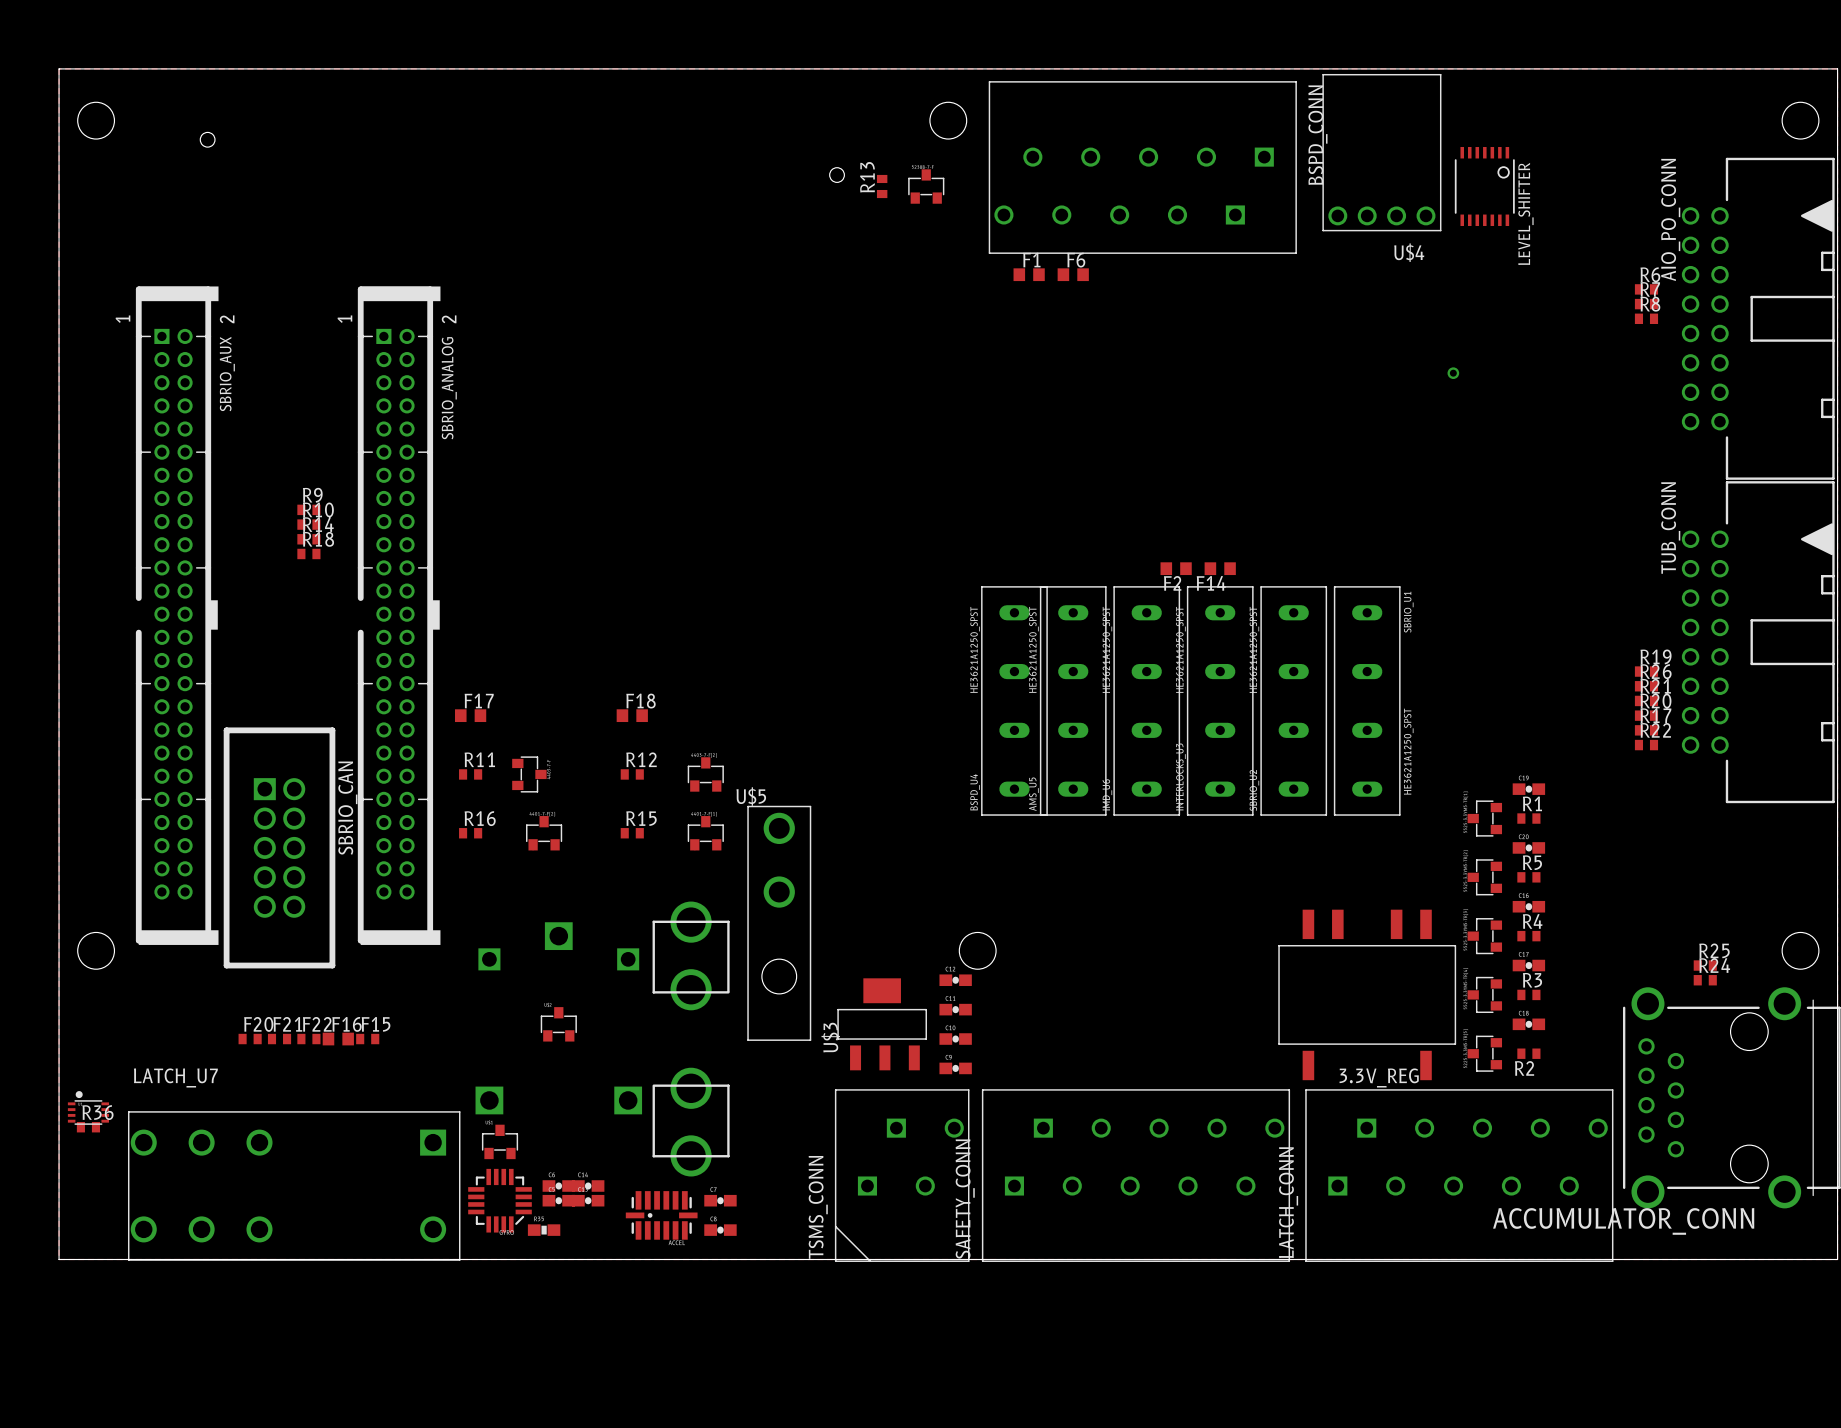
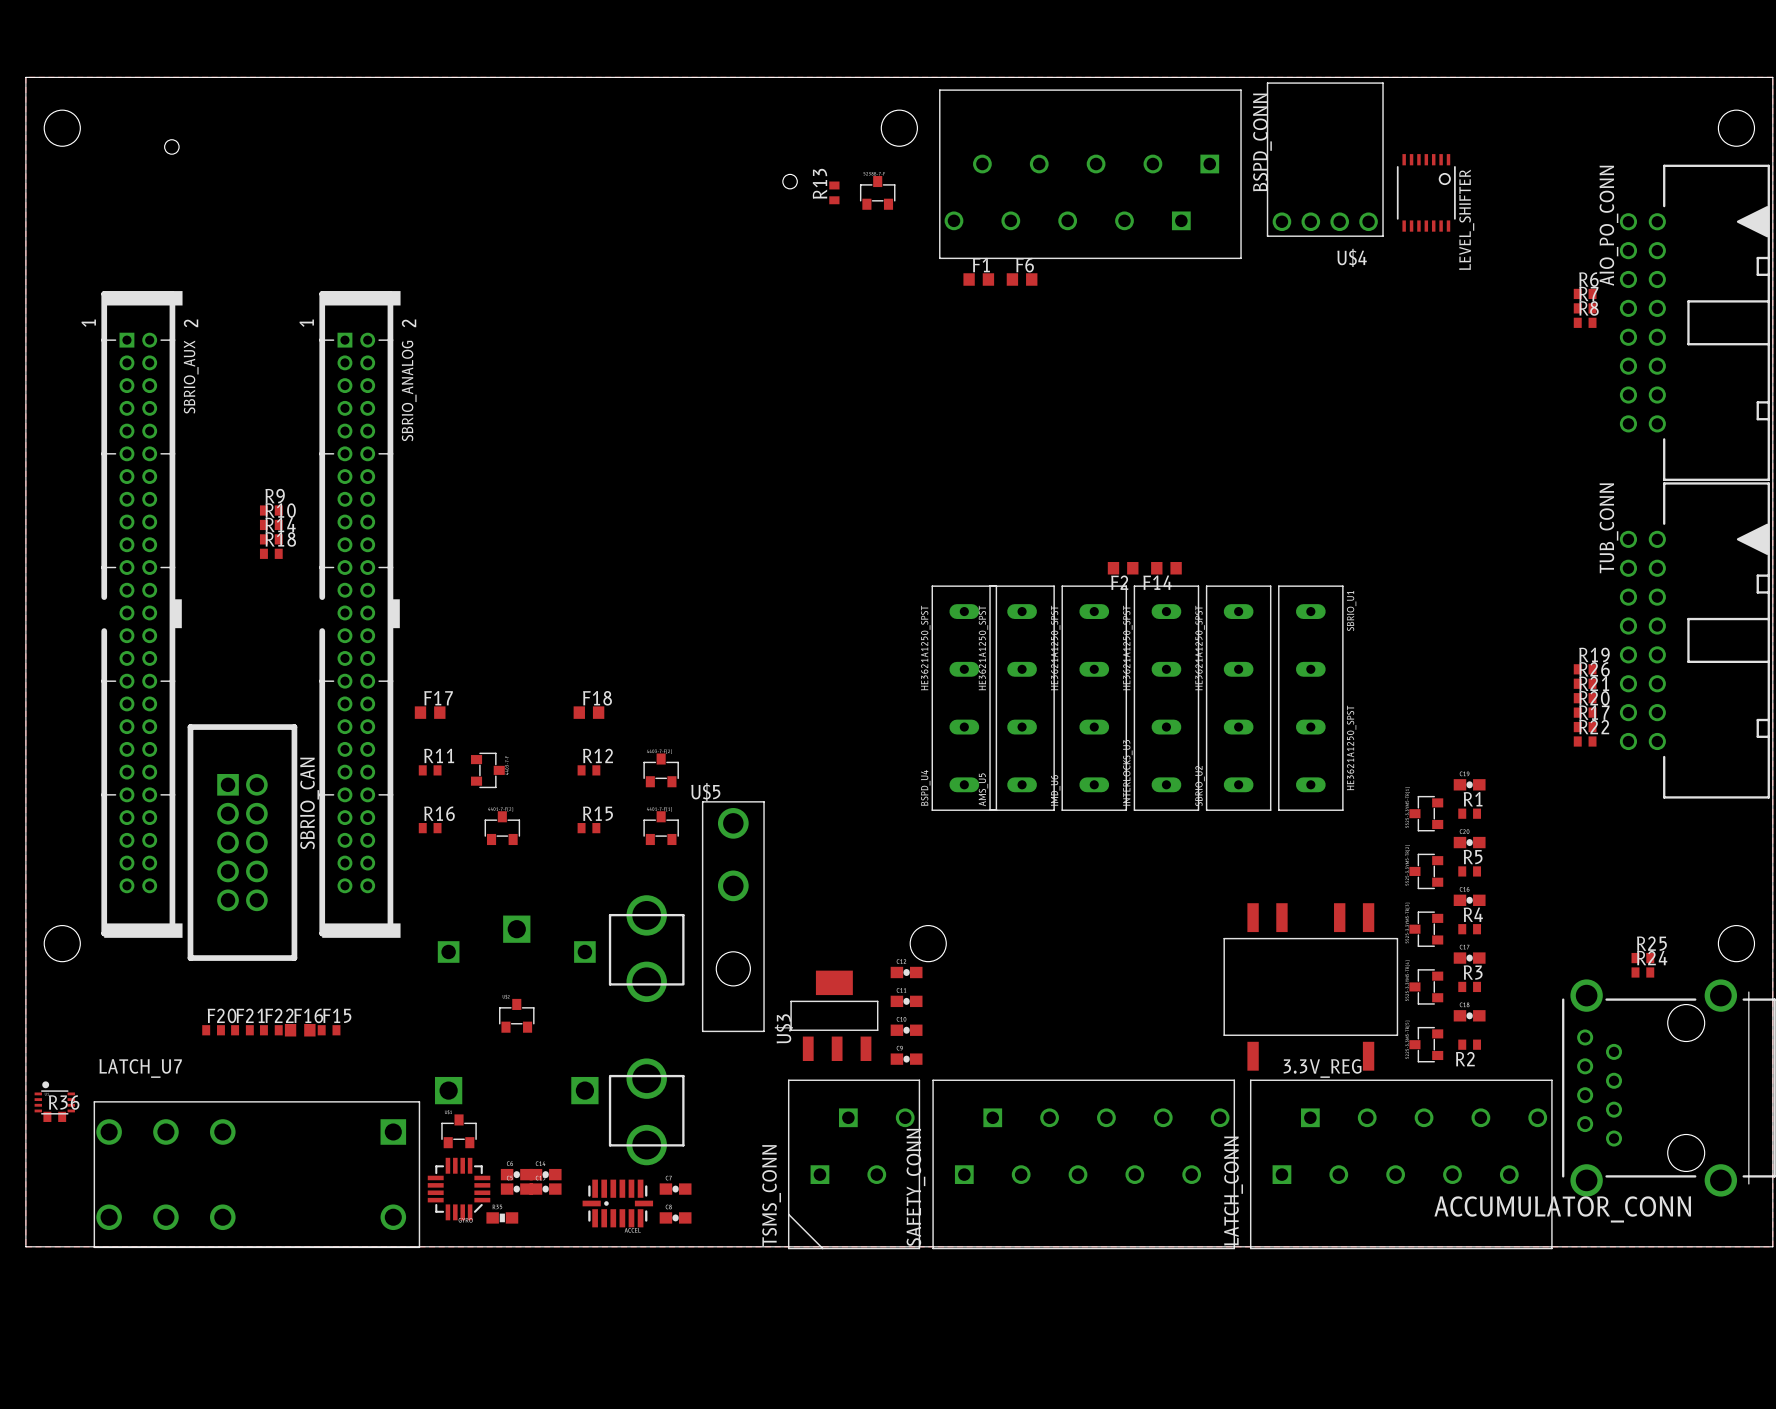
via: (1453, 373) -> none

